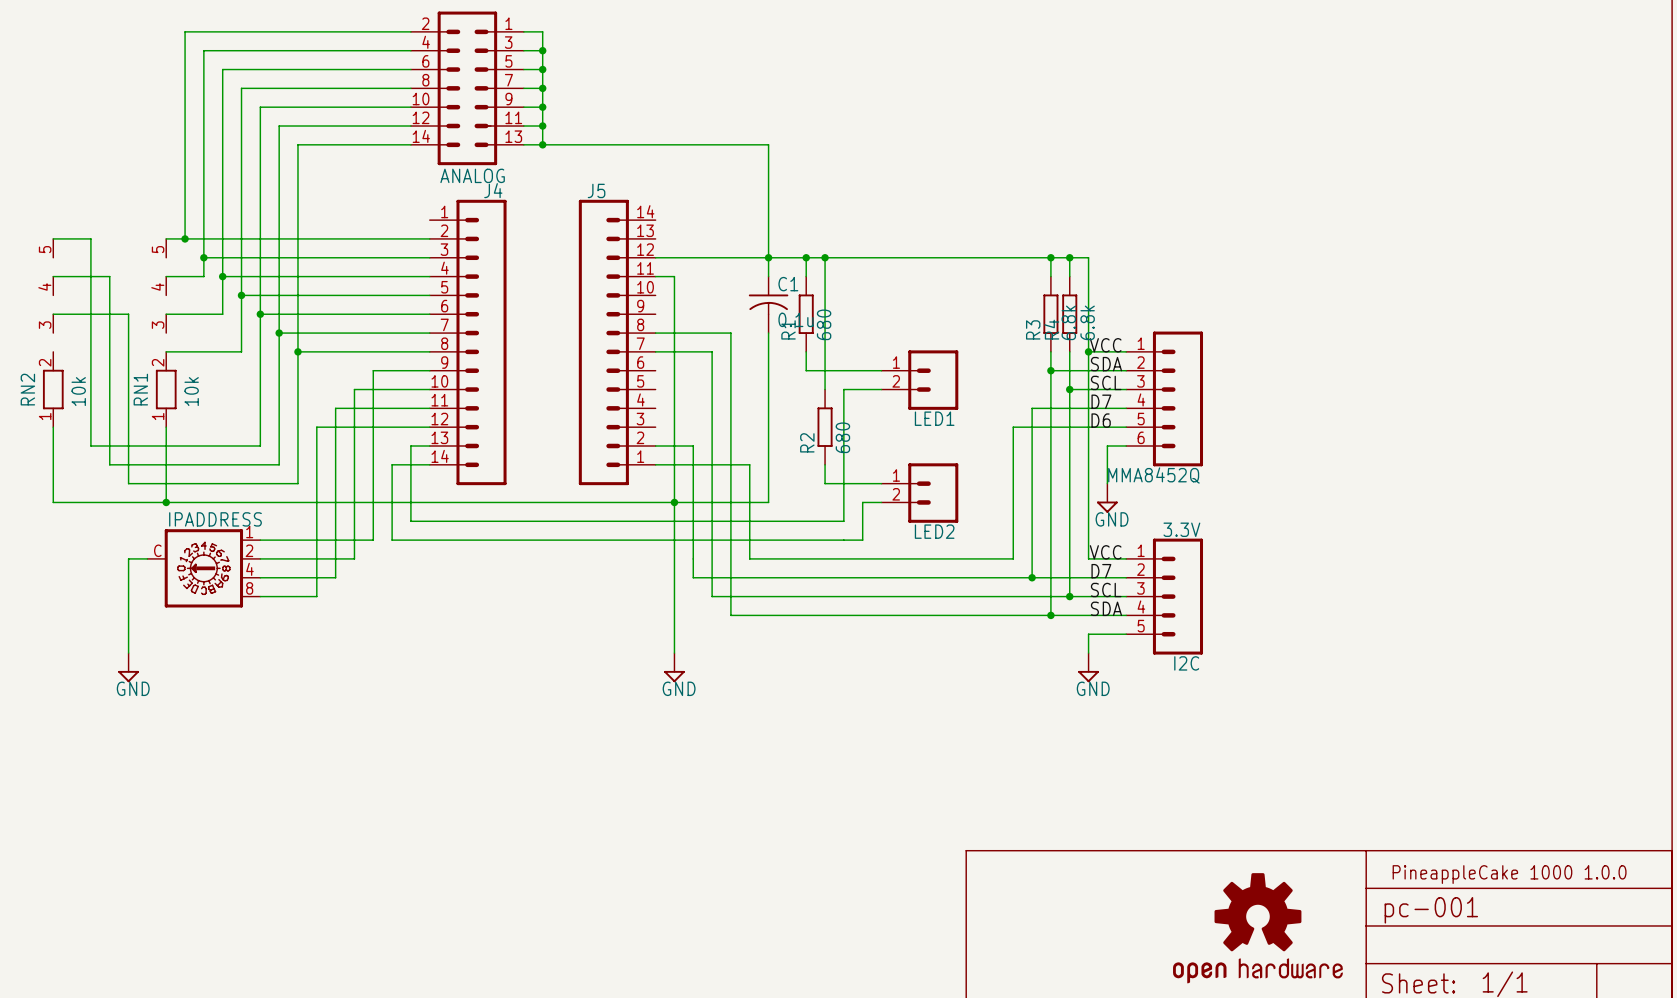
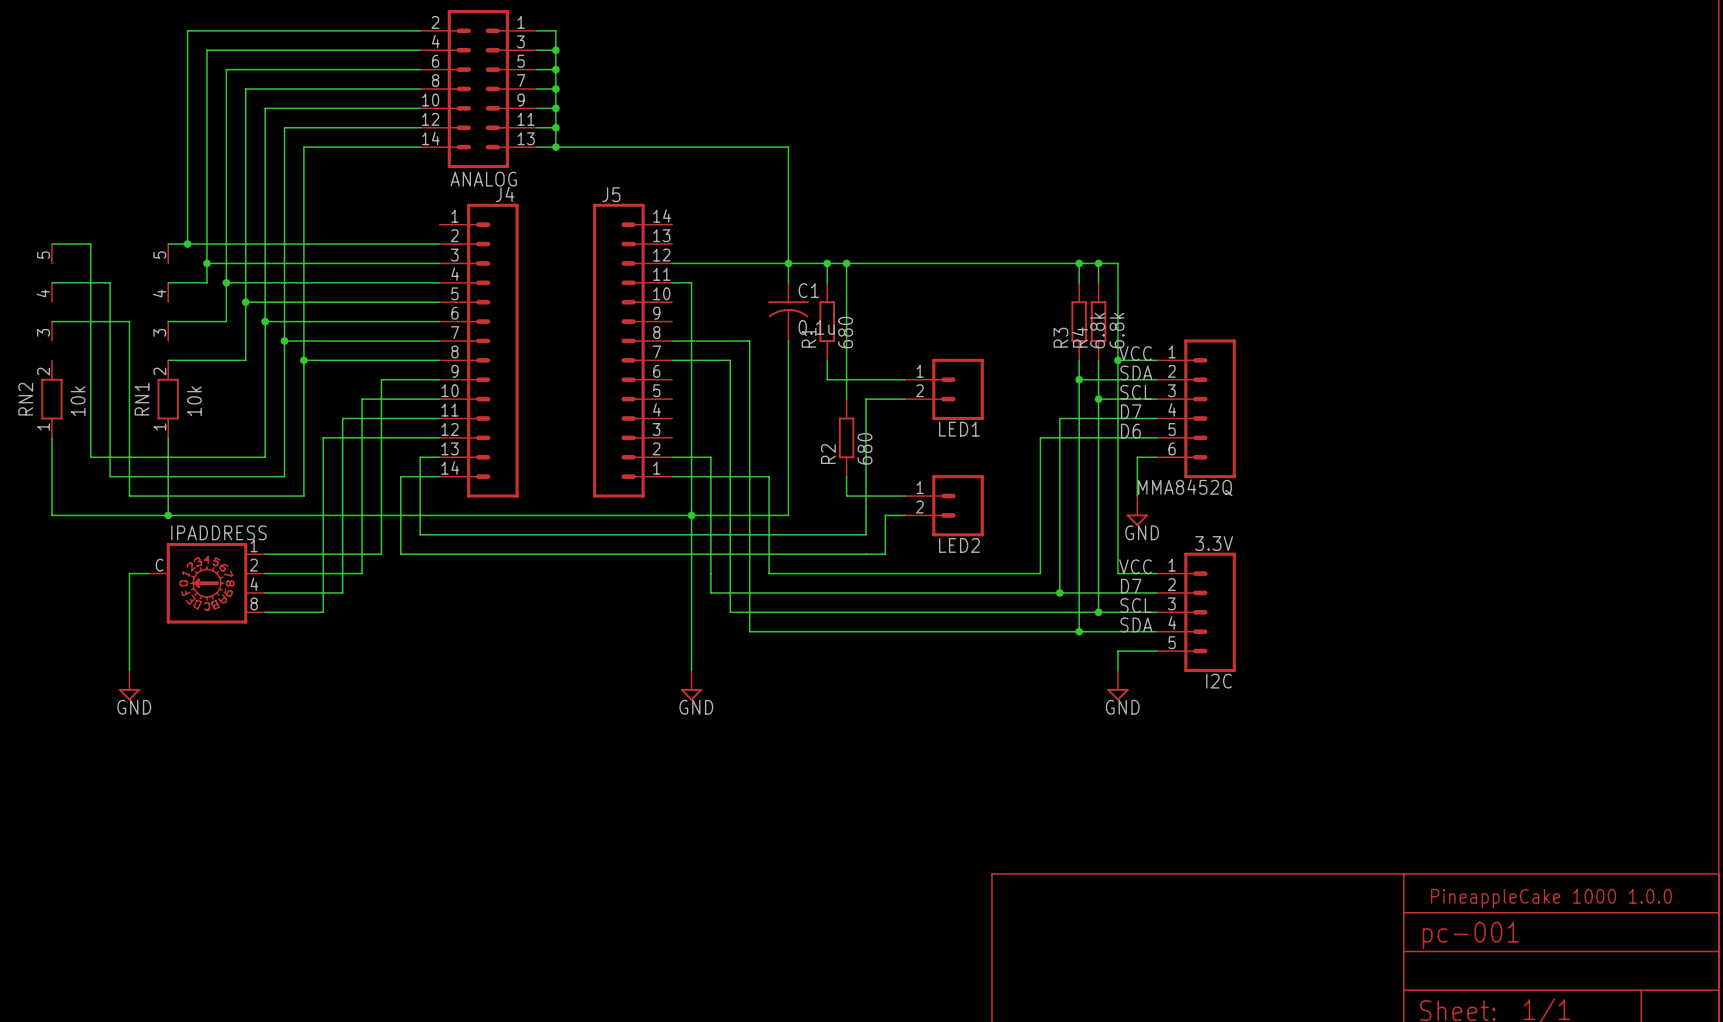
part: (1257, 928) -> none

